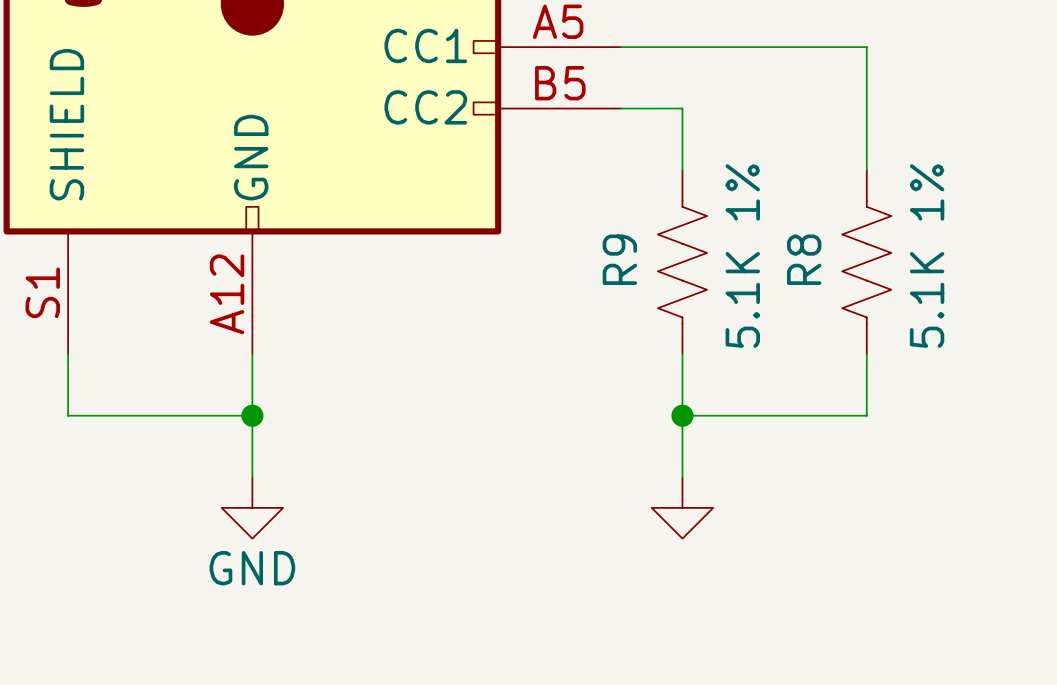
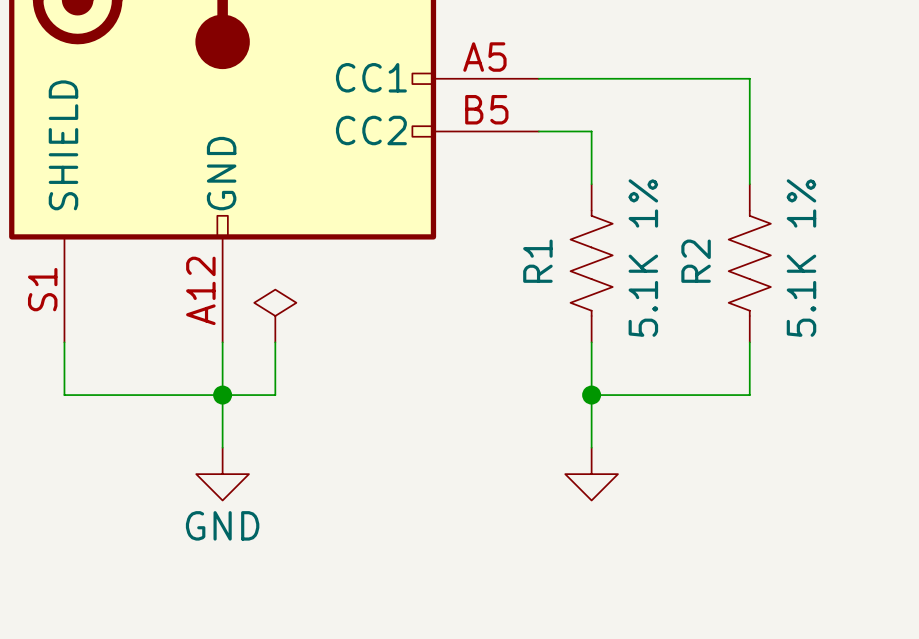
R9 name: R9 (619, 259) -> R1 (537, 261)
R8 name: R8 (804, 259) -> R2 (696, 261)
power symbol: none -> (275, 315)
wire: none -> (275, 342) (275, 395) (222, 395)

